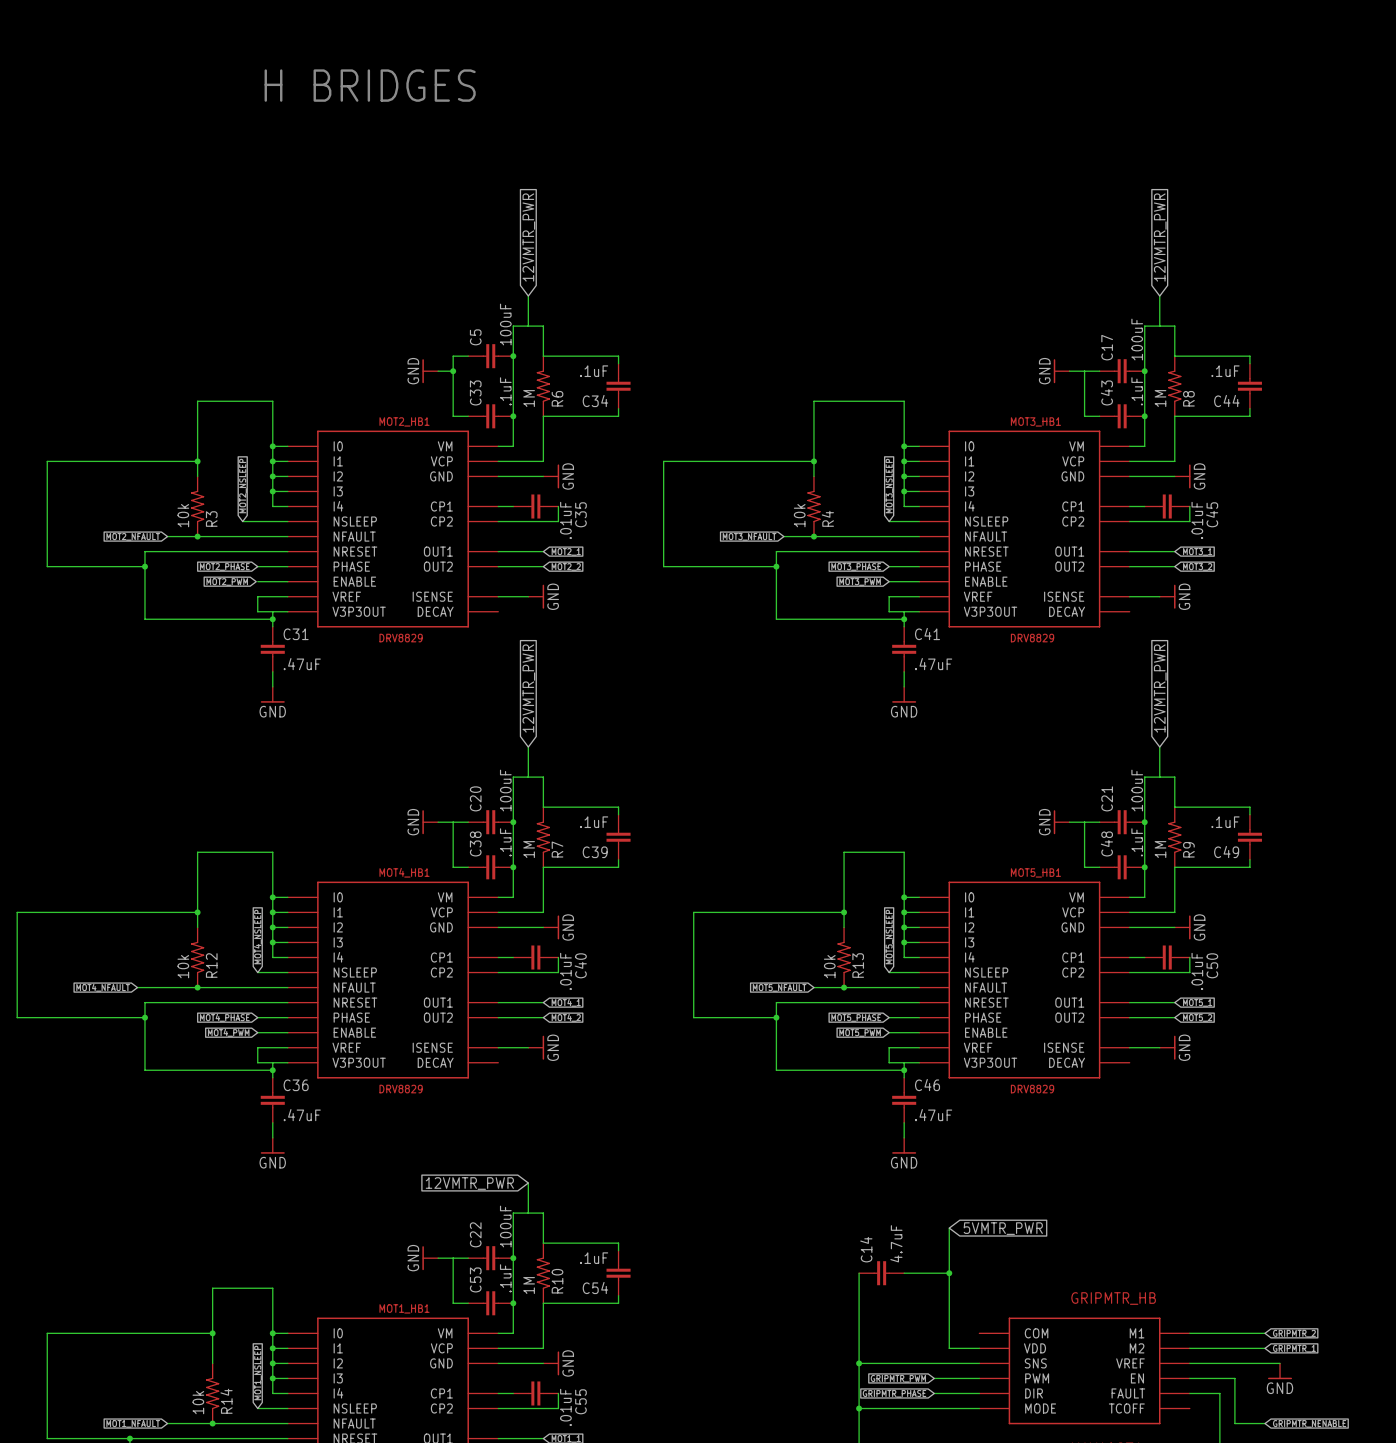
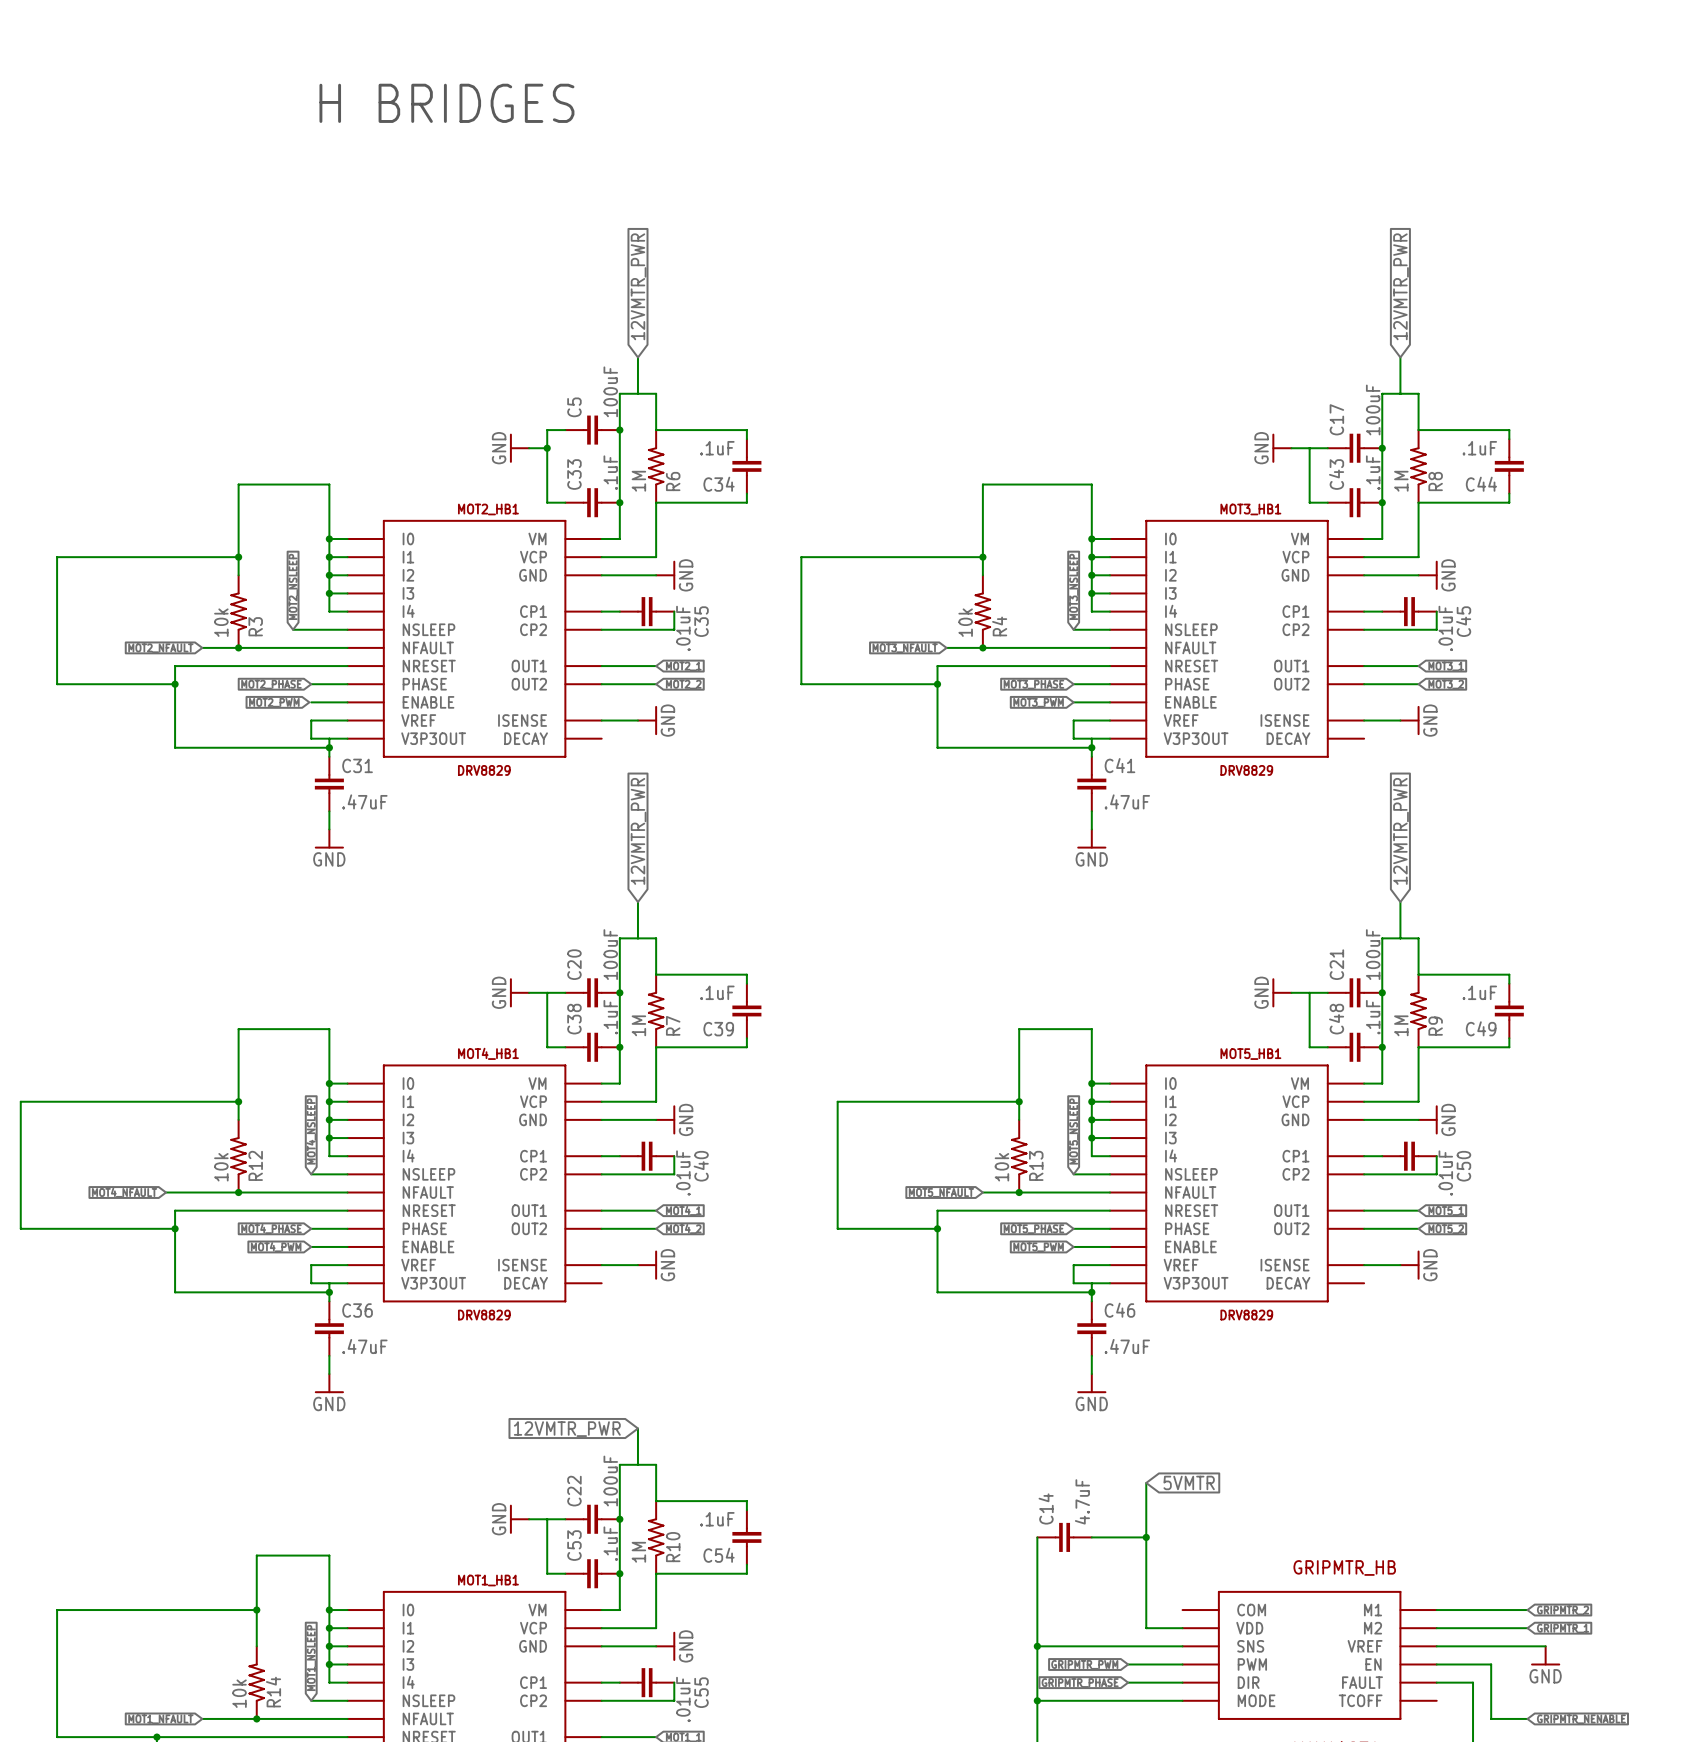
global label: 5VMTR_PWR (1003, 1228) -> 5VMTR (1189, 1482)

